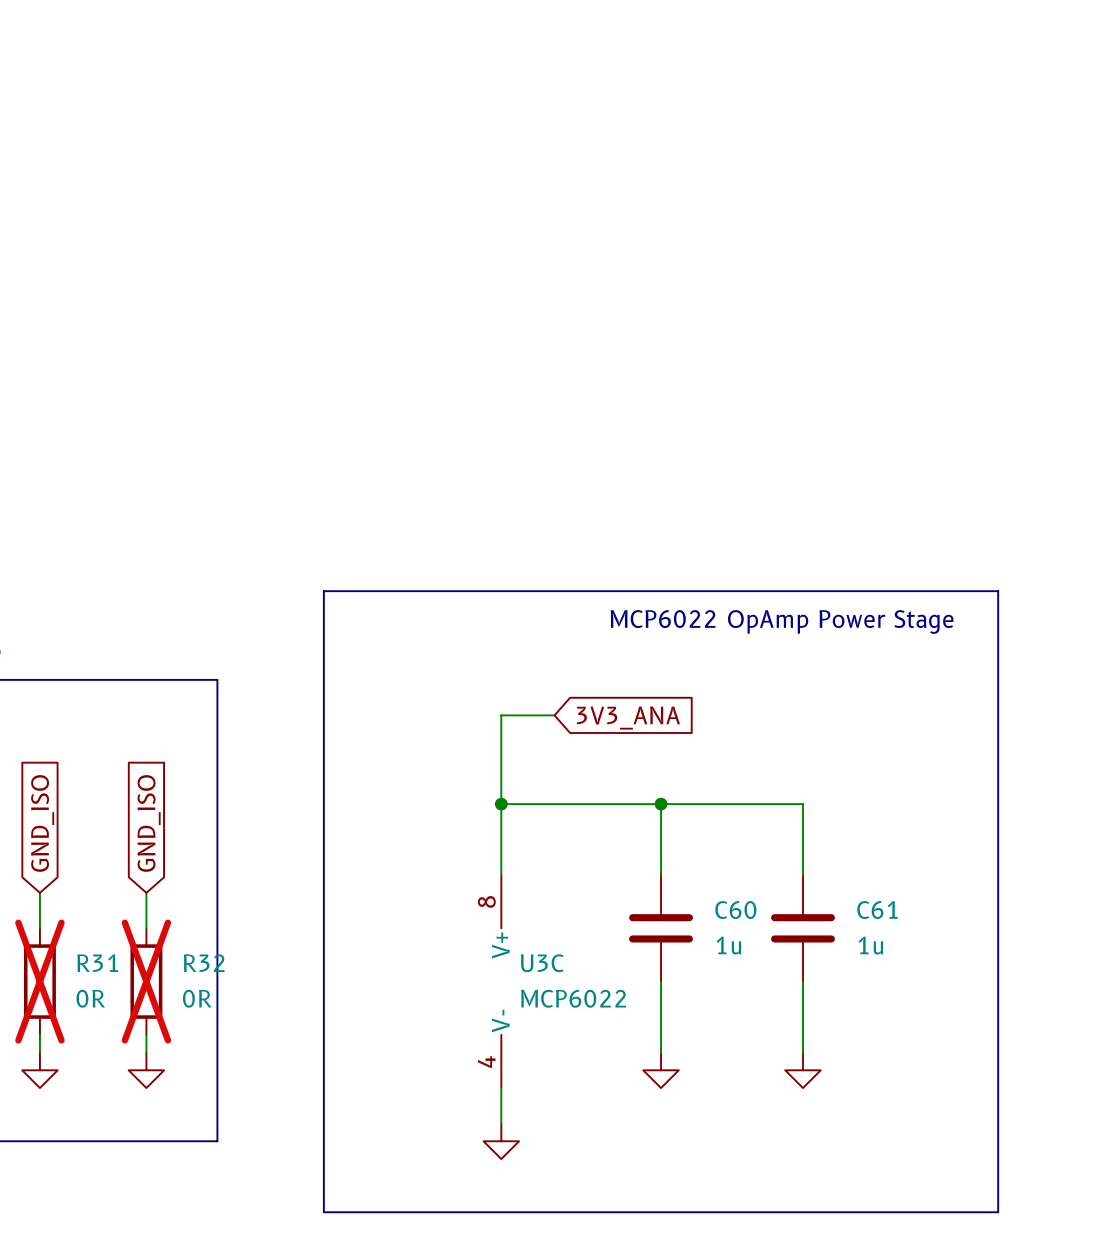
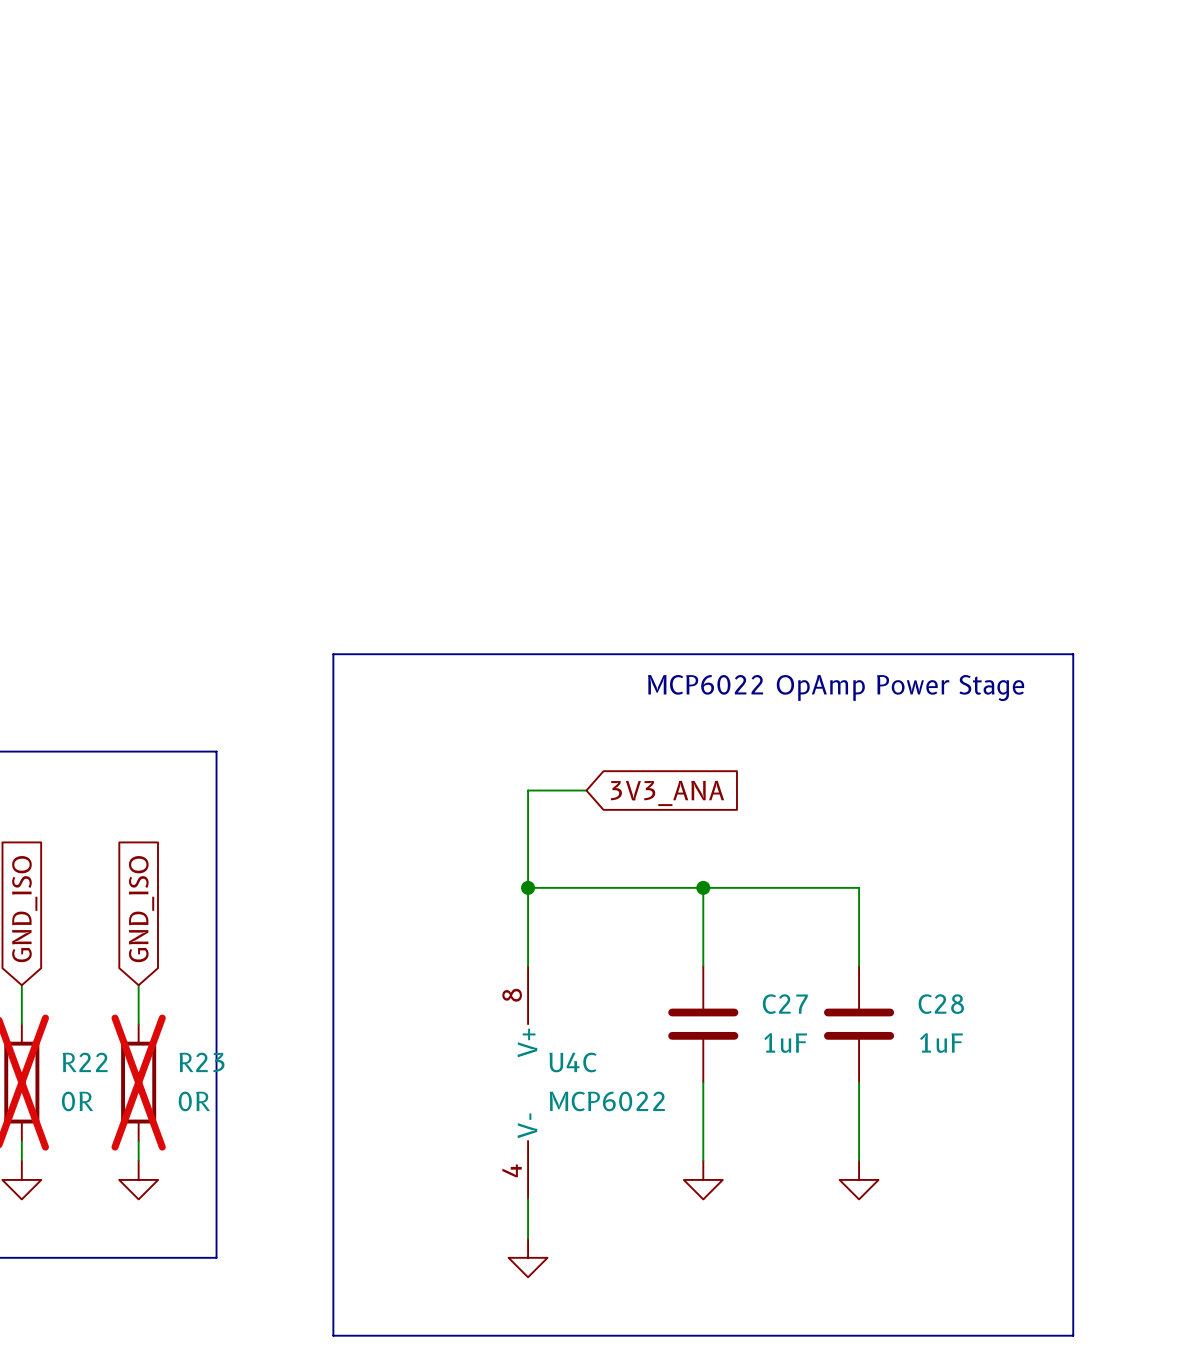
C60 name: C60 (735, 910) -> C27 (785, 1004)
C61 name: C61 (877, 910) -> C28 (941, 1004)
C60 value: 1u (728, 945) -> 1uF (785, 1043)
C61 value: 1u (870, 945) -> 1uF (941, 1043)
R31 name: R31 (97, 963) -> R22 (85, 1062)
R32 name: R32 (204, 963) -> R23 (202, 1062)
U3C name: U3C (542, 963) -> U4C (572, 1062)

